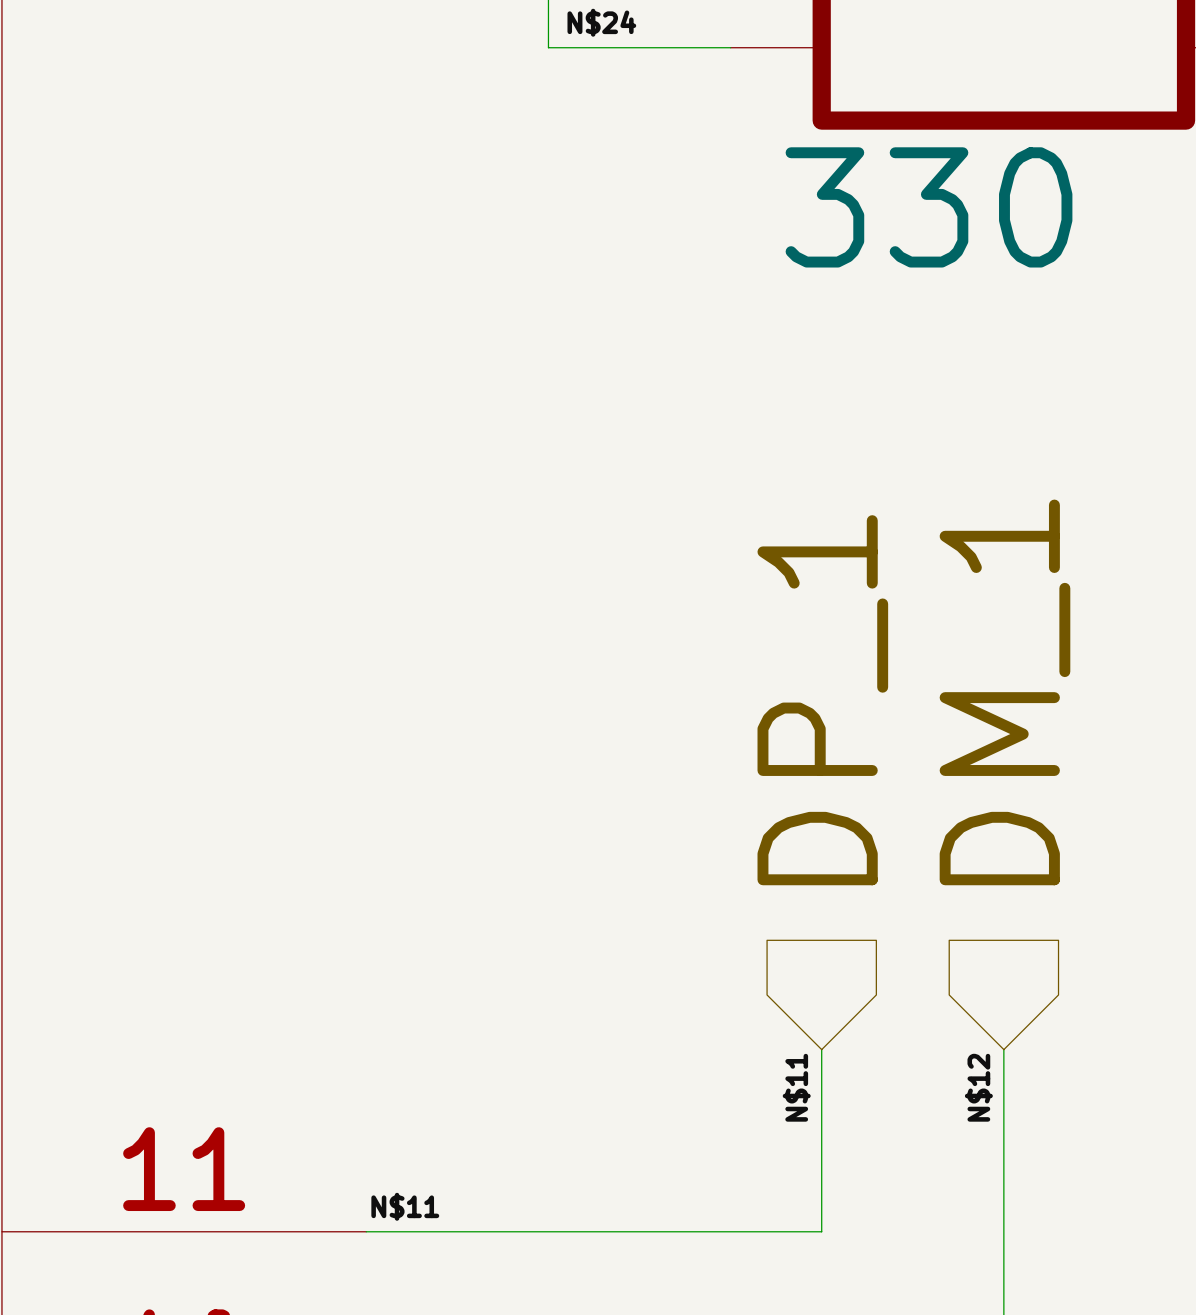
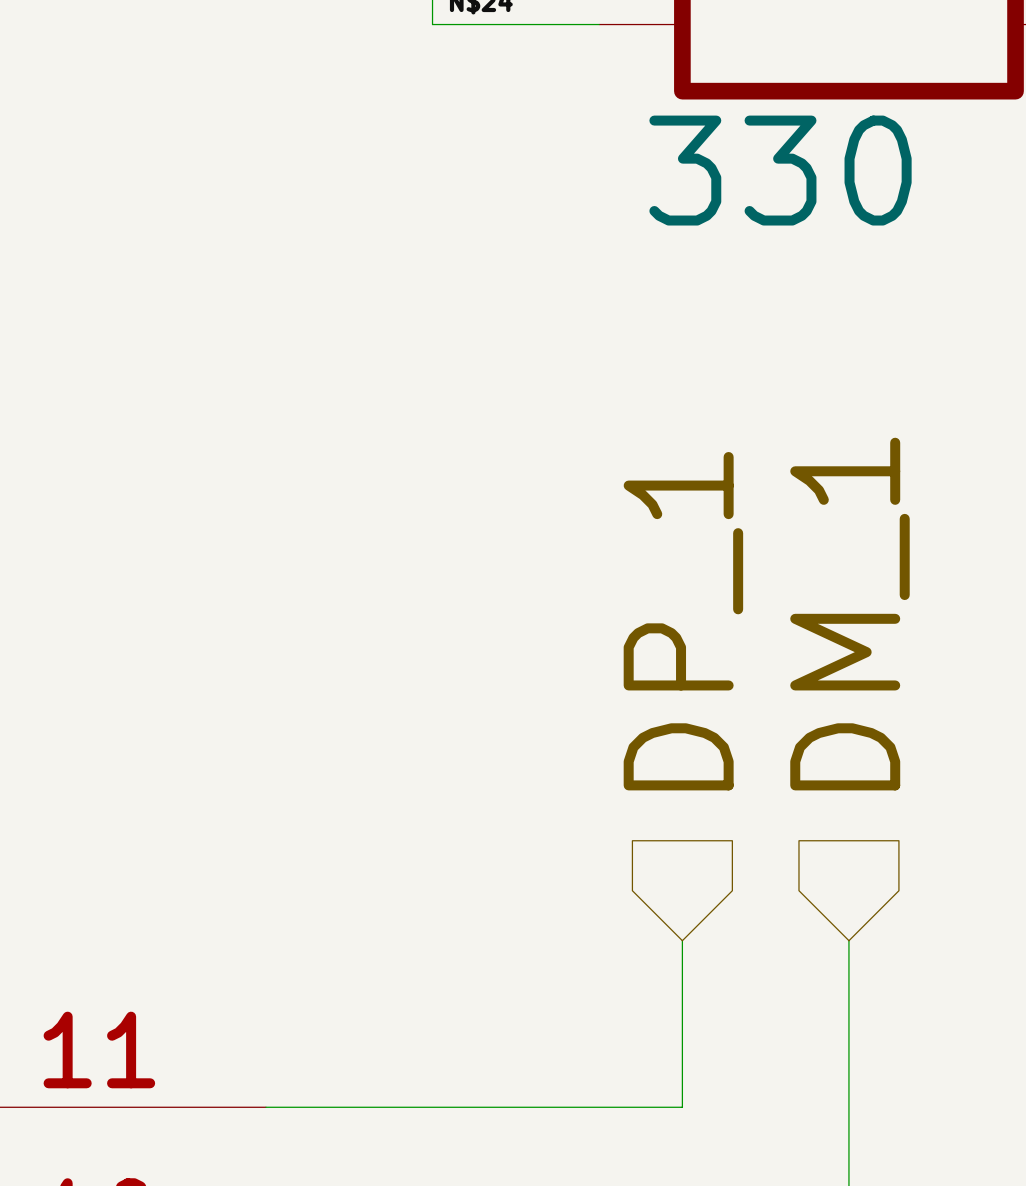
label: N$11 (796, 1087) -> none
label: N$12 (978, 1087) -> none
label: N$11 (405, 1206) -> none

